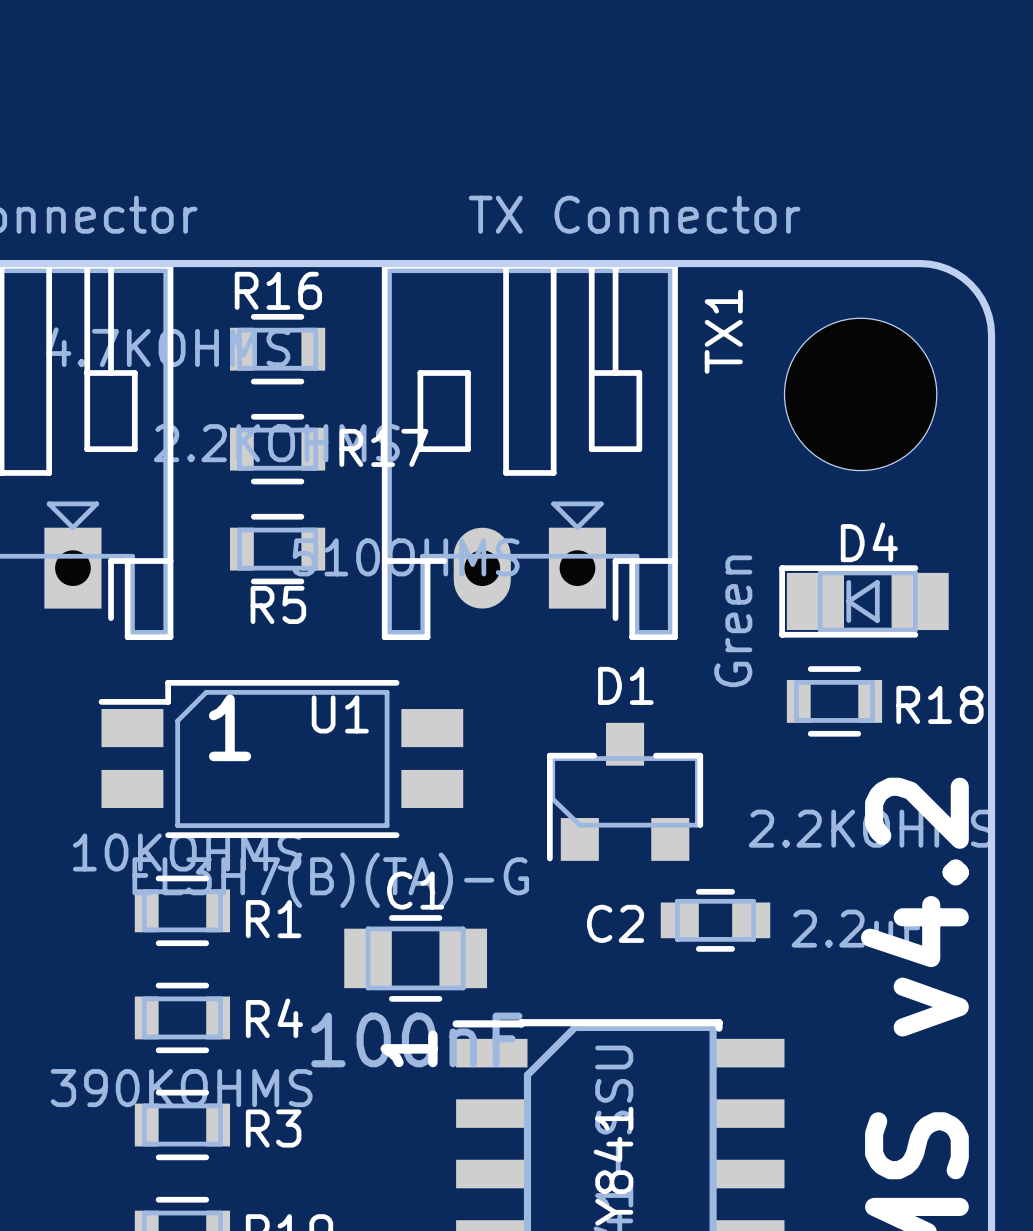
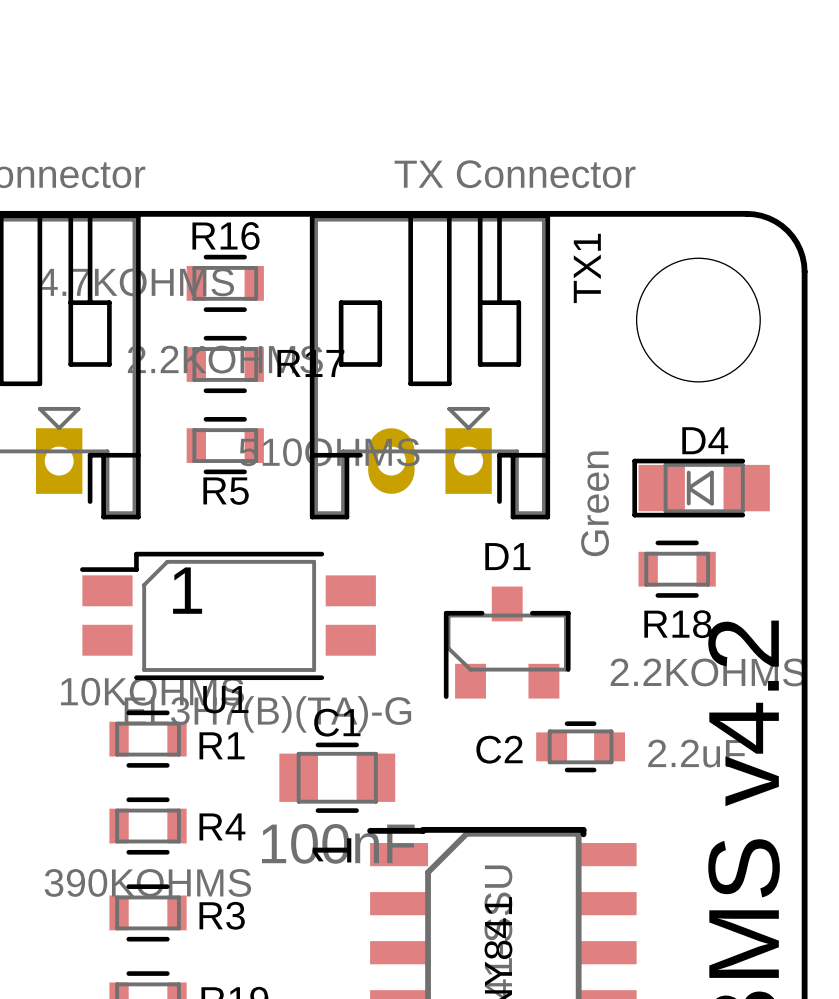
R18 name position: R18 (939, 704) -> R18 (677, 624)
U1 name position: U1 (340, 714) -> U1 (225, 699)

